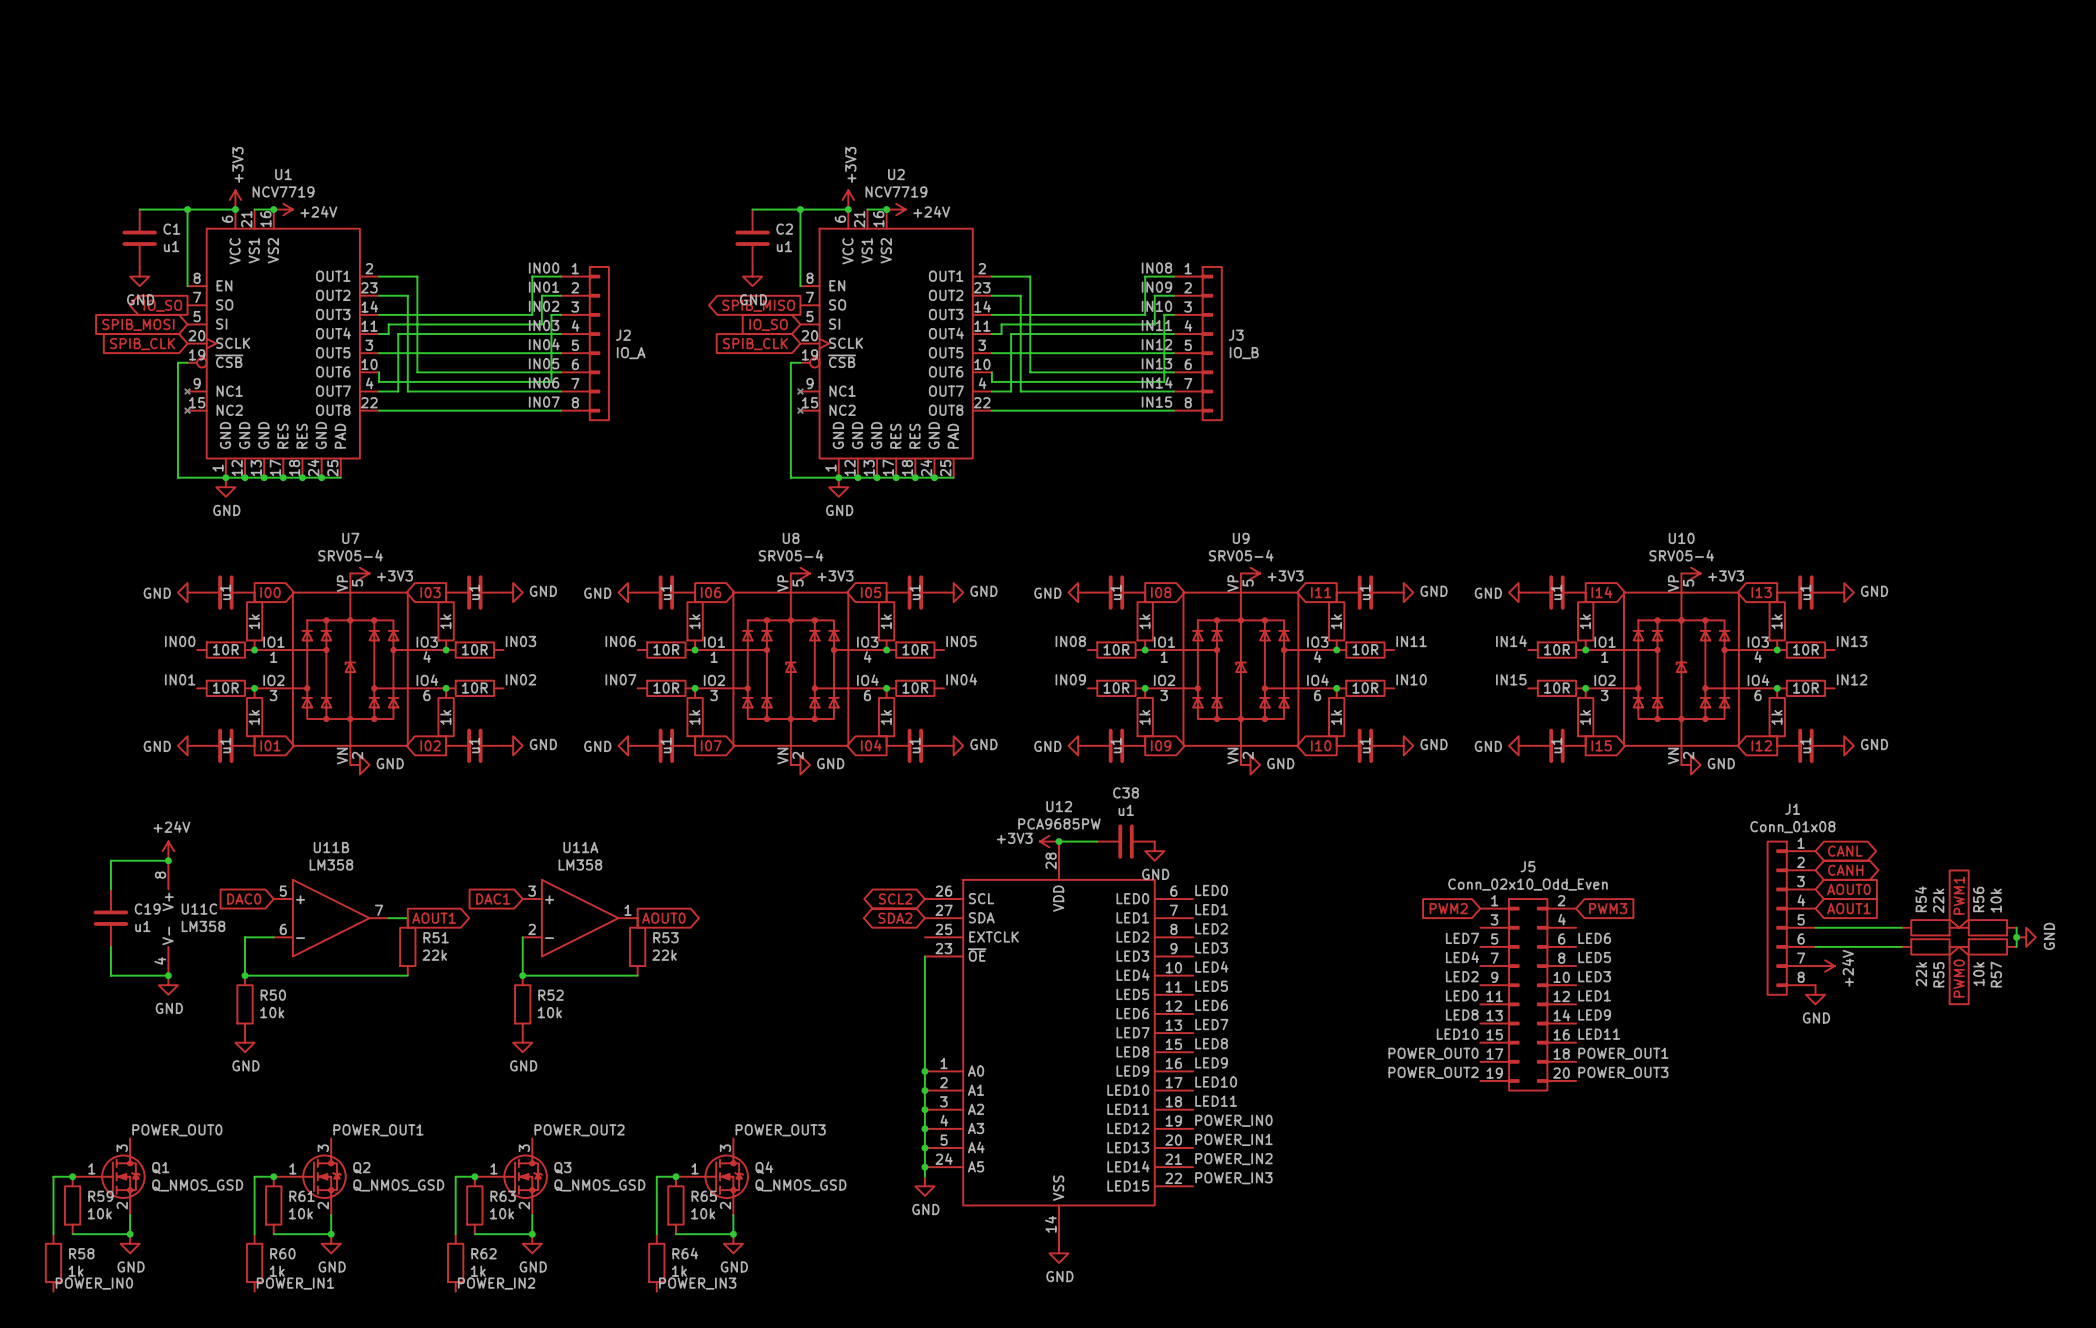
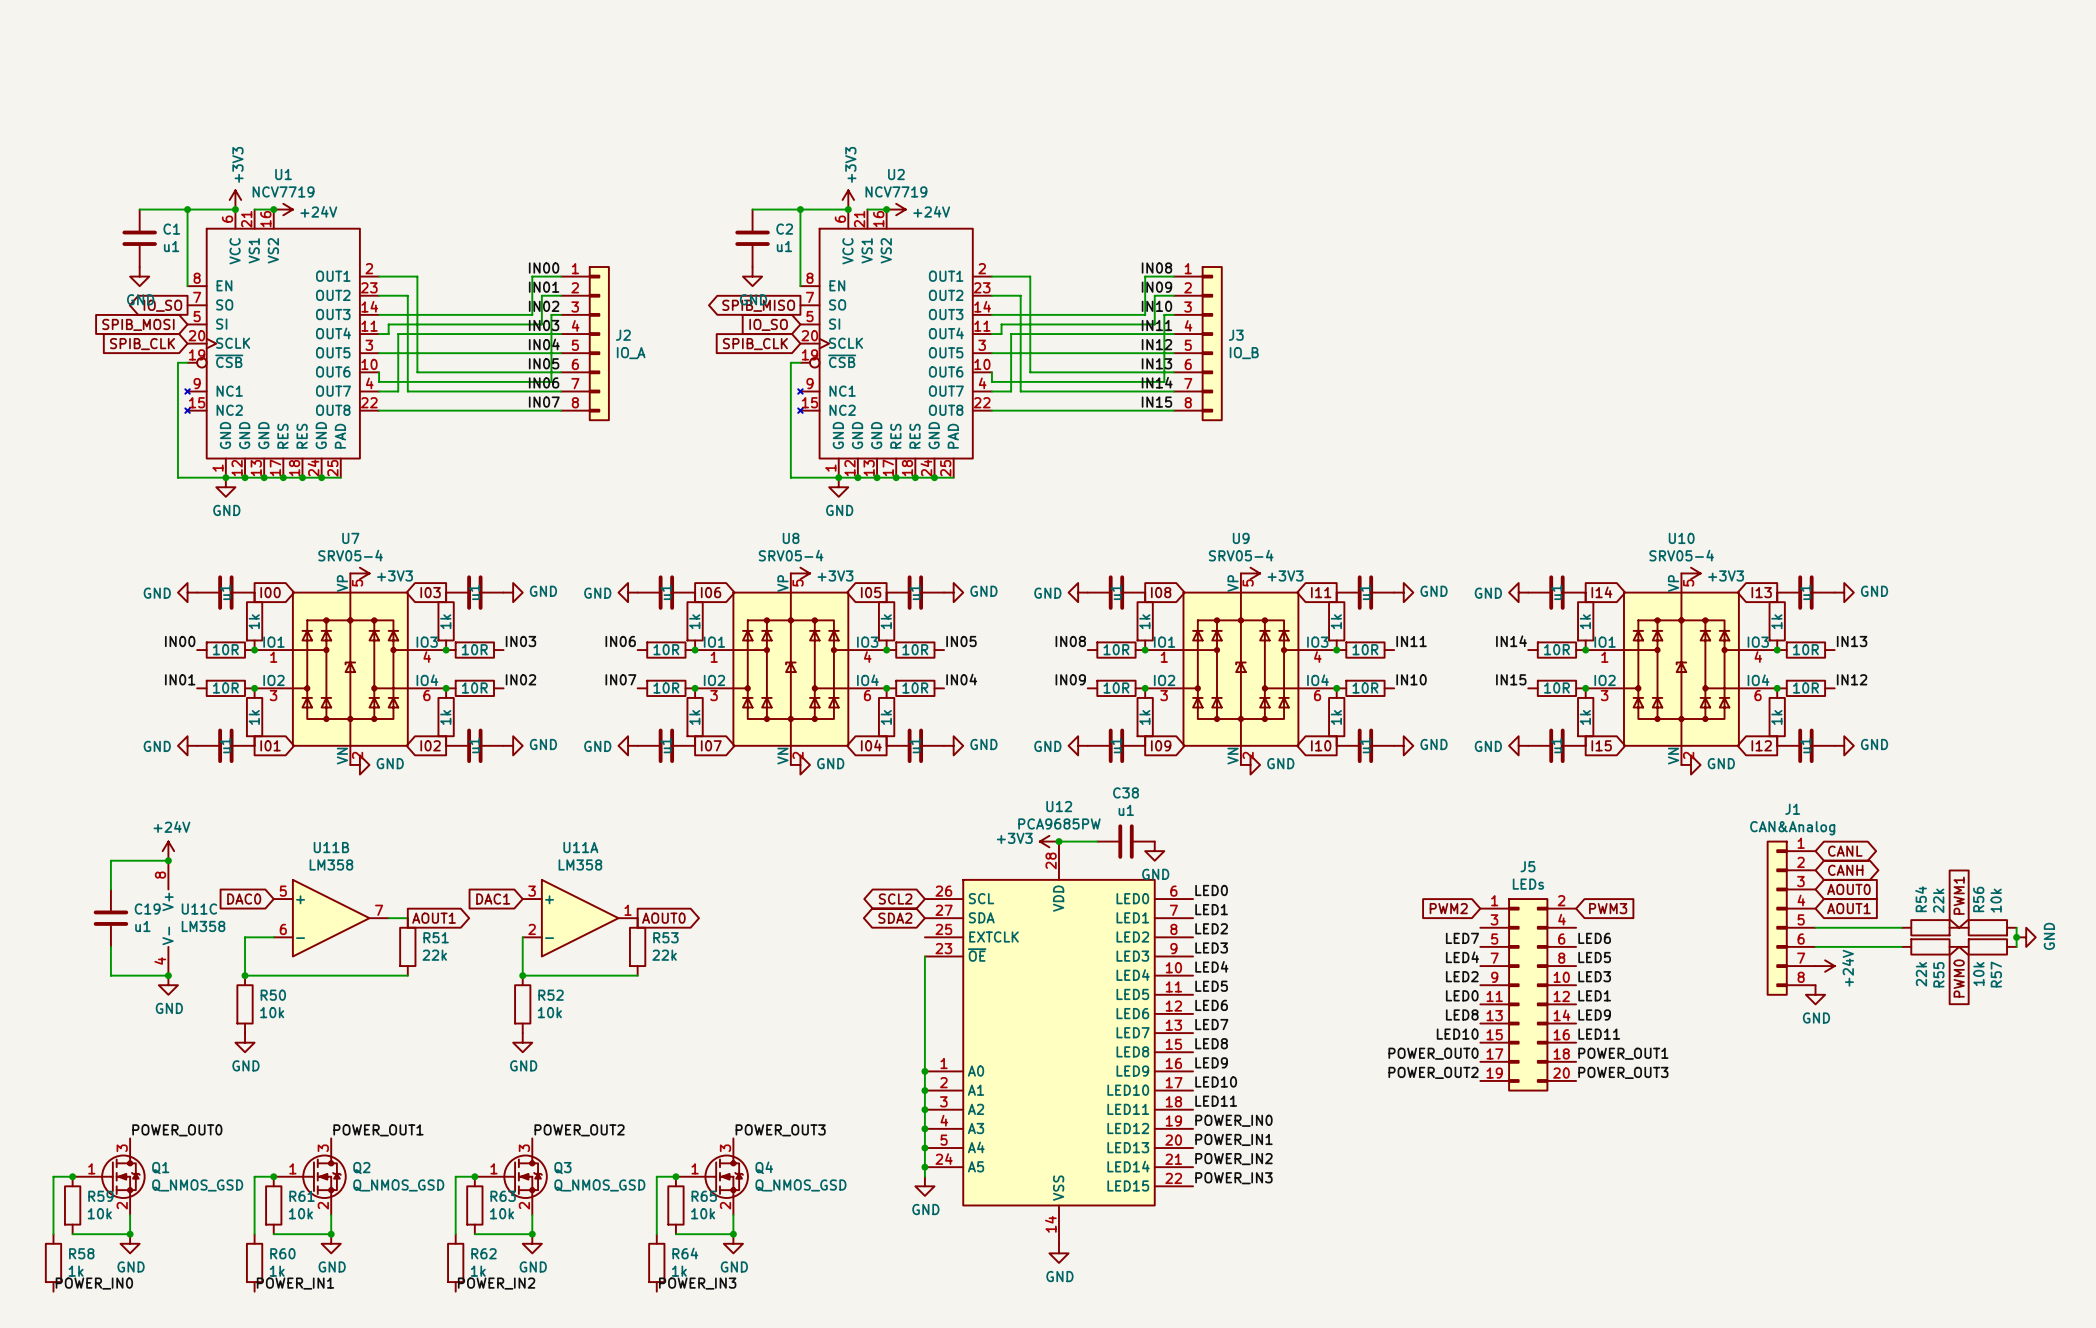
J1 value: Conn_01x08 (1792, 827) -> CAN&Analog (1792, 828)
J5 value: Conn_02x10_Odd_Even (1528, 884) -> LEDs (1528, 884)

